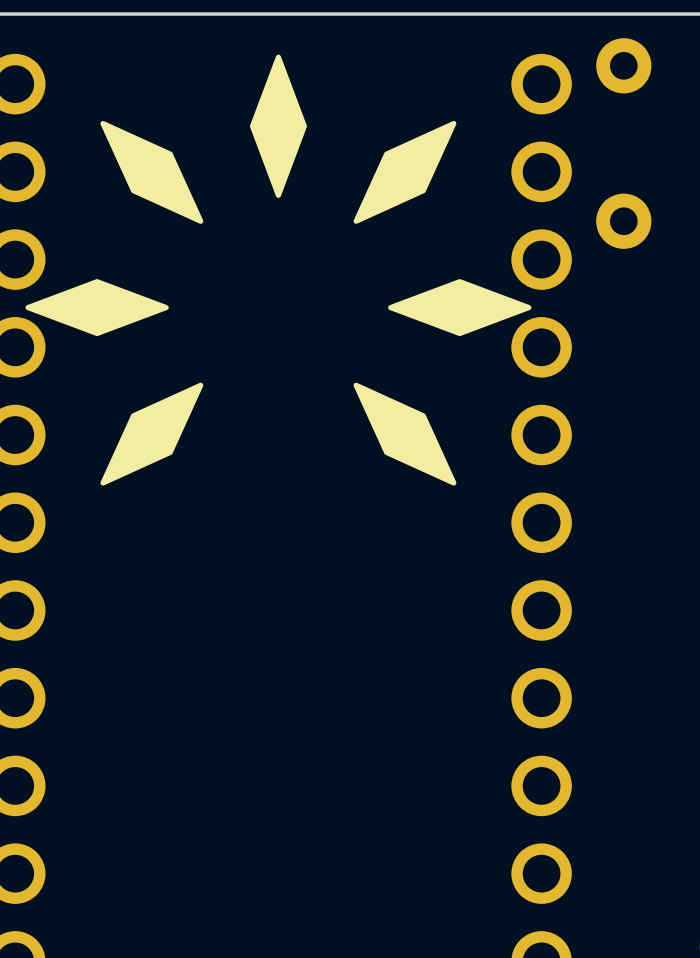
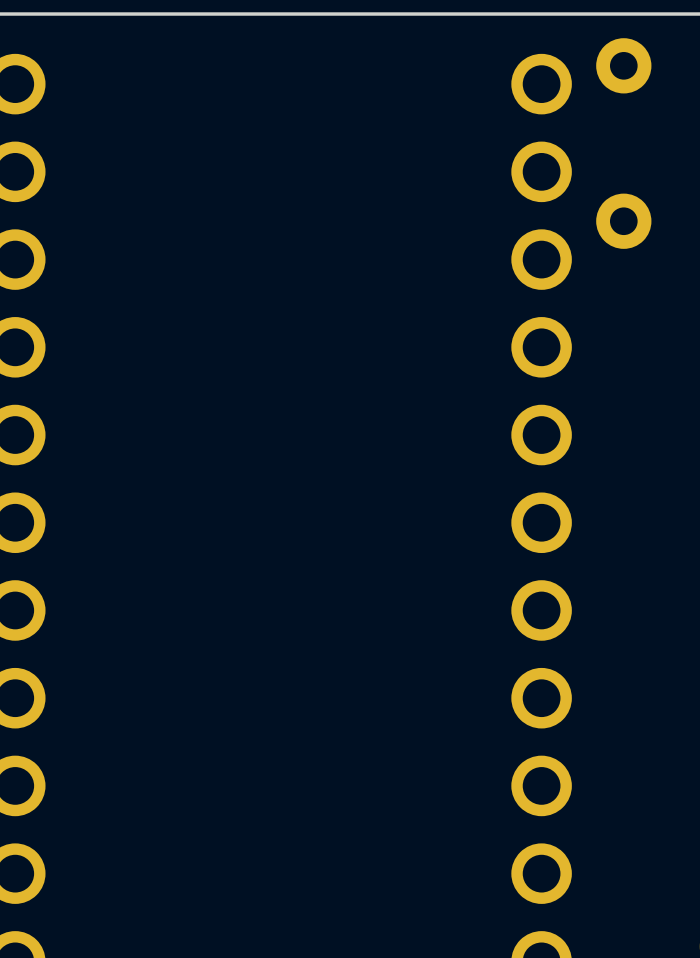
drawing: [249, 54, 307, 198] -> none
drawing: [100, 120, 204, 224] -> none
drawing: [353, 120, 457, 224] -> none
drawing: [25, 279, 169, 337] -> none
drawing: [388, 279, 532, 337] -> none
drawing: [100, 382, 204, 486] -> none
drawing: [353, 382, 457, 486] -> none

